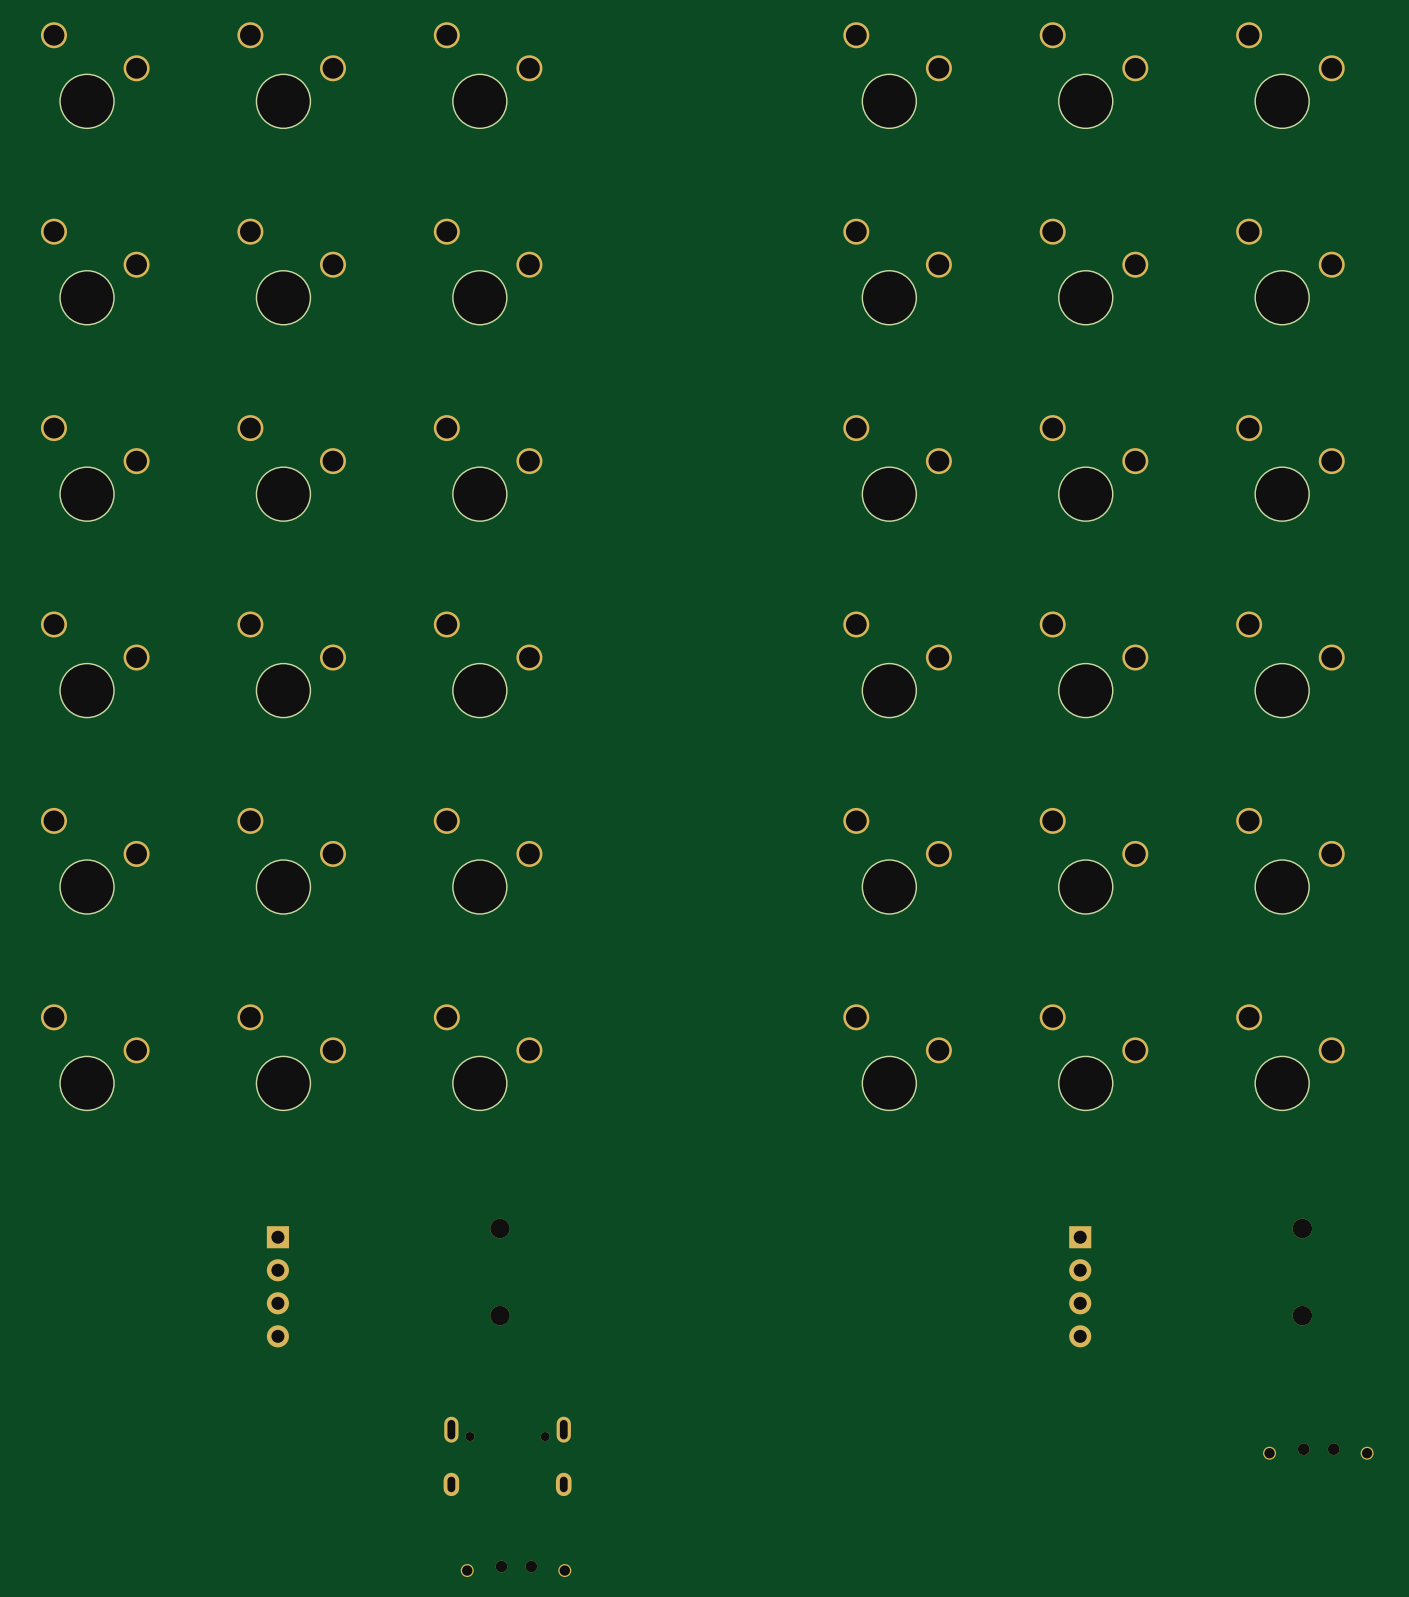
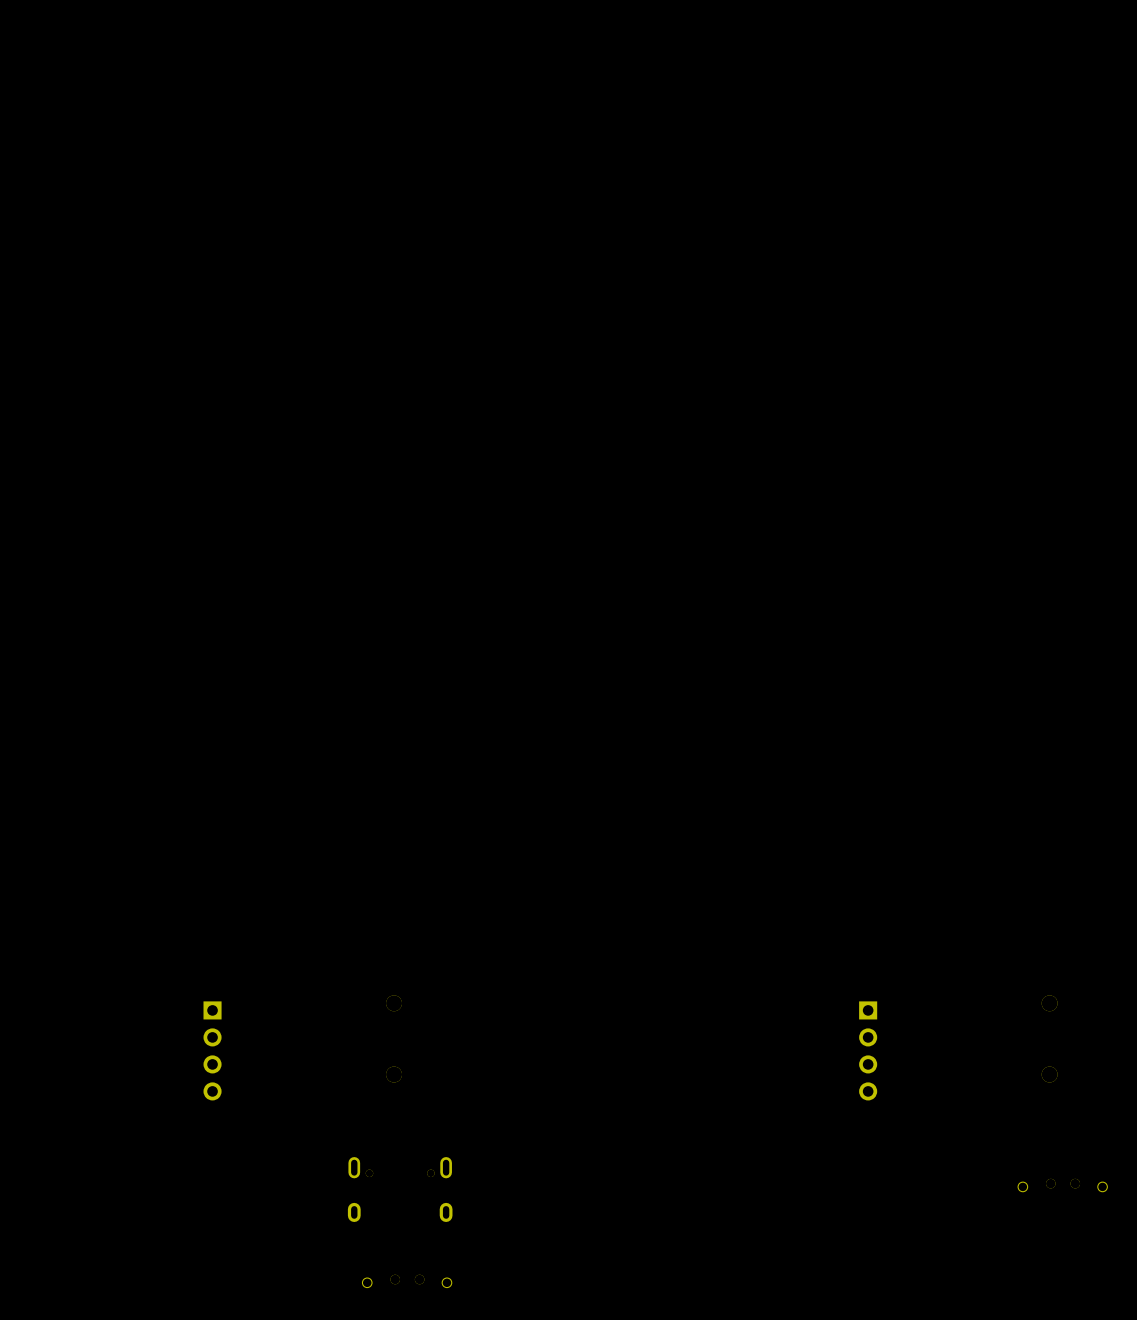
part: (95, 75) -> none
part: (291, 75) -> none
part: (488, 75) -> none
part: (897, 75) -> none
part: (1094, 75) -> none
part: (1290, 75) -> none
part: (95, 271) -> none
part: (291, 271) -> none
part: (488, 271) -> none
part: (897, 271) -> none
part: (1094, 271) -> none
part: (1290, 271) -> none
part: (95, 468) -> none
part: (291, 468) -> none
part: (488, 468) -> none
part: (897, 468) -> none
part: (1094, 468) -> none
part: (1290, 468) -> none
part: (95, 664) -> none
part: (291, 664) -> none
part: (488, 664) -> none
part: (897, 664) -> none
part: (1094, 664) -> none
part: (1290, 664) -> none
part: (95, 860) -> none
part: (291, 860) -> none
part: (488, 860) -> none
part: (897, 860) -> none
part: (1094, 860) -> none
part: (1290, 860) -> none
part: (95, 1057) -> none
part: (291, 1057) -> none
part: (488, 1057) -> none
part: (897, 1057) -> none
part: (1094, 1057) -> none
part: (1290, 1057) -> none

